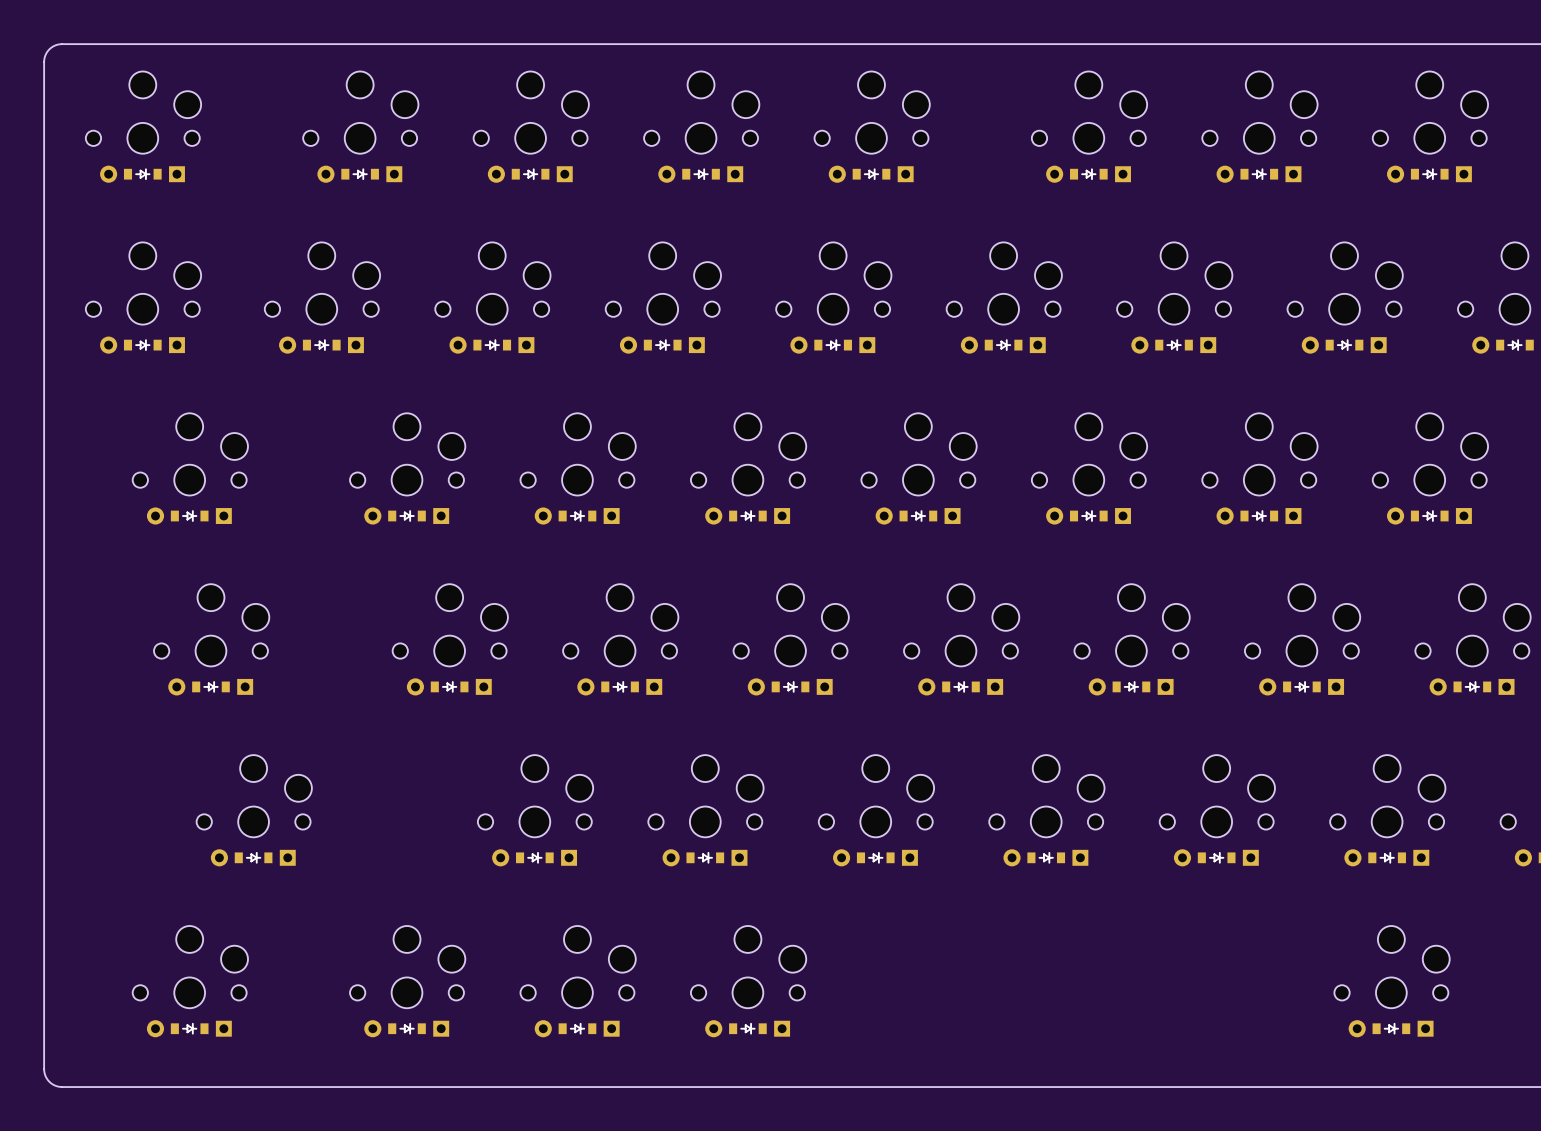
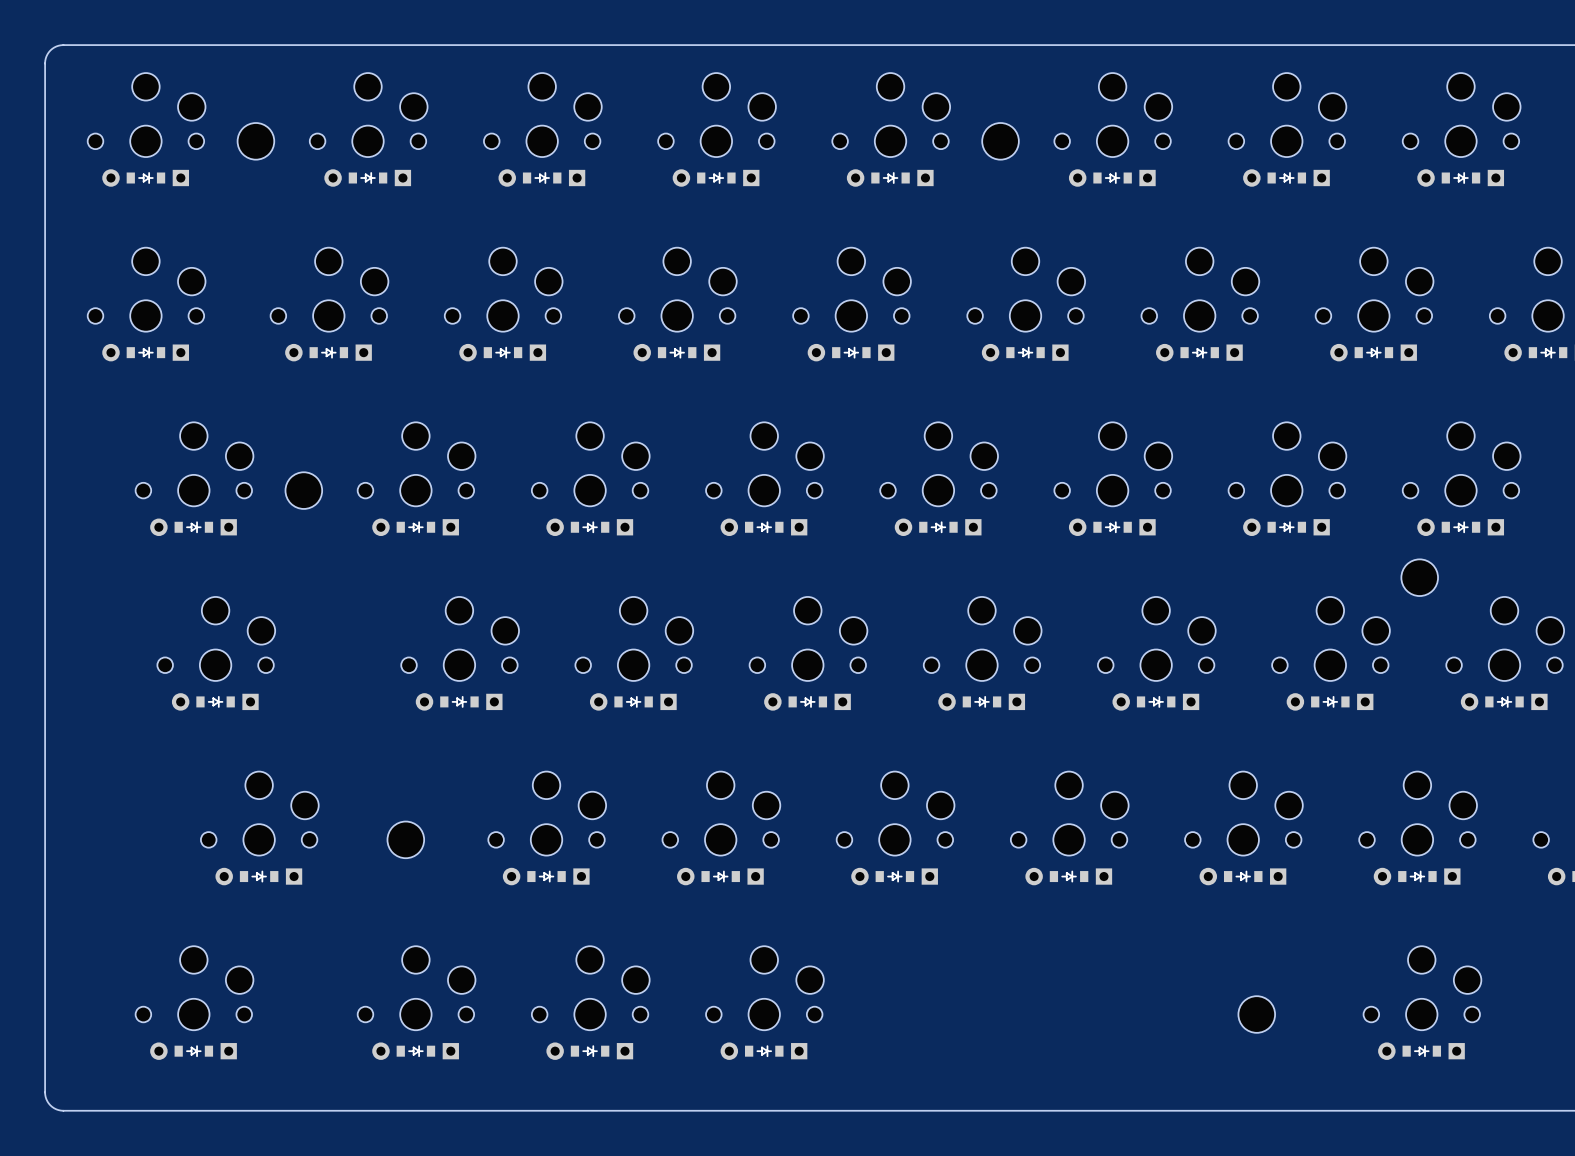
part: none -> (255, 141)
part: none -> (1000, 141)
part: none -> (303, 490)
part: none -> (1419, 577)
part: none -> (405, 839)
part: none -> (1256, 1014)

